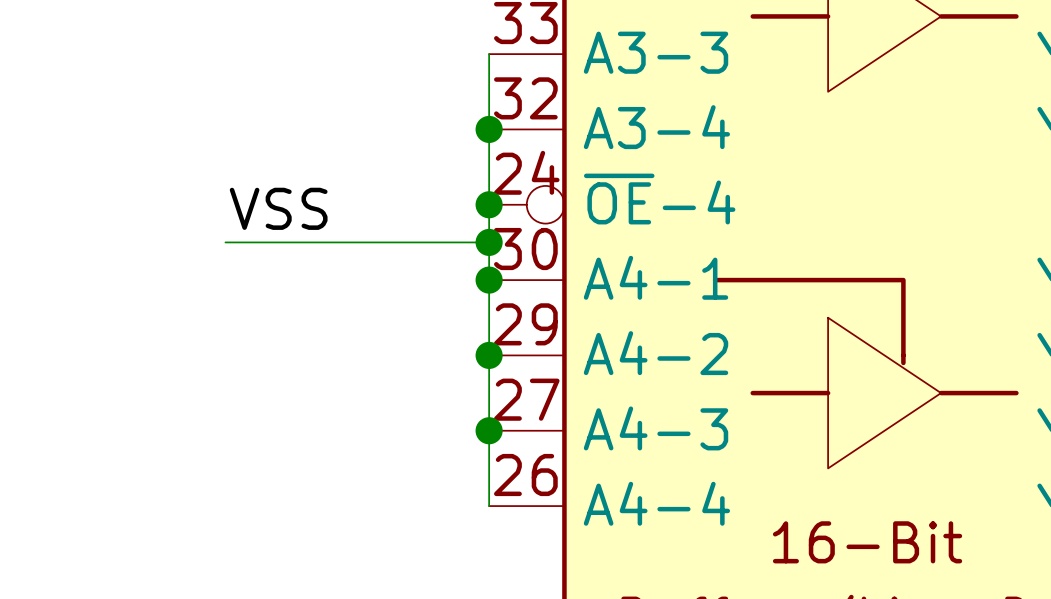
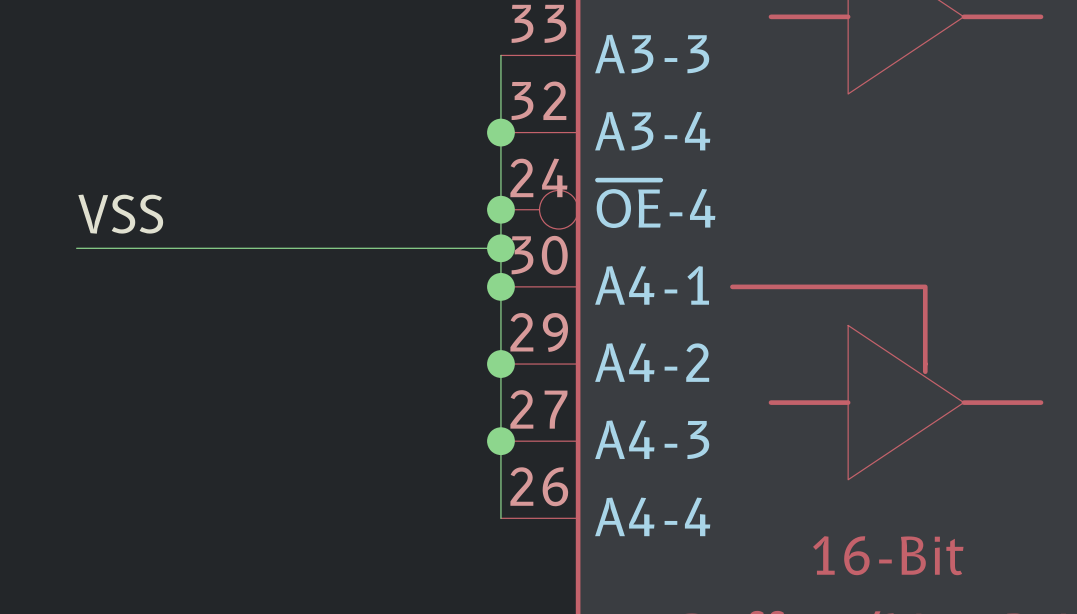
label position: VSS (278, 208) -> VSS (120, 214)
wire: none -> (76, 248) (230, 248)

